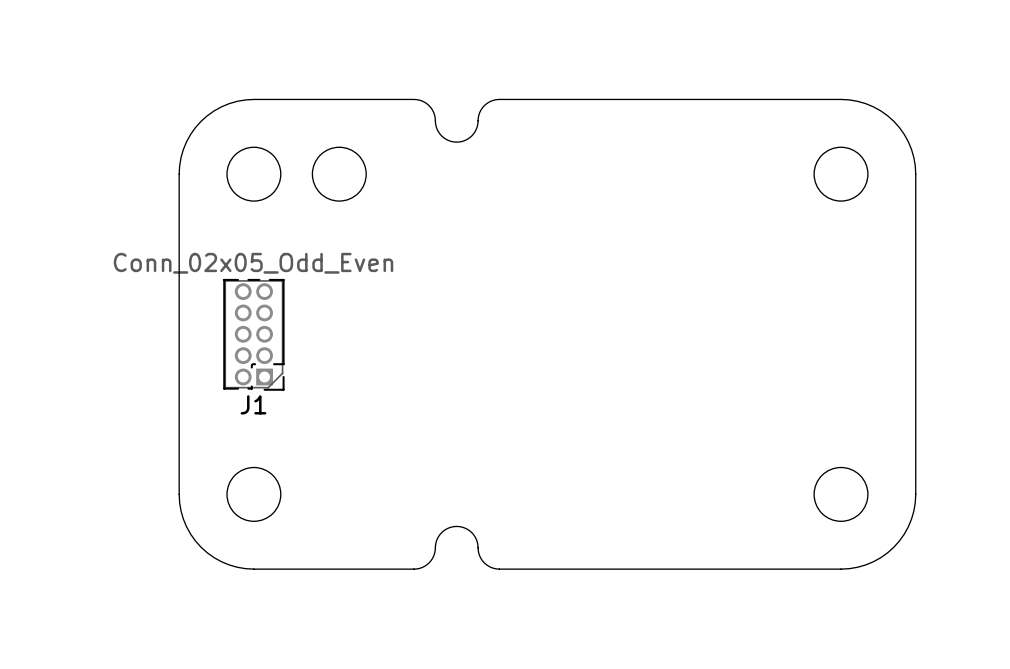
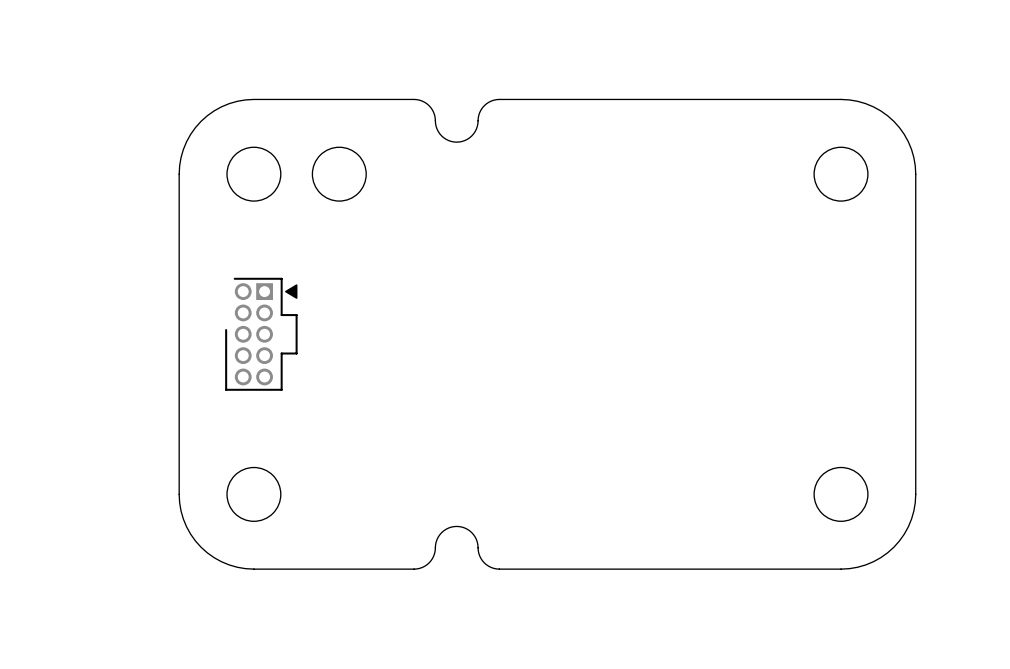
line: none -> (234, 278) (281, 278) (281, 315) (296, 315) (296, 353) (281, 353) (281, 389) (226, 389) (226, 330)
drawing: none -> [285, 284, 298, 299]
J1 side: bottom (253, 334) -> top (253, 334)

